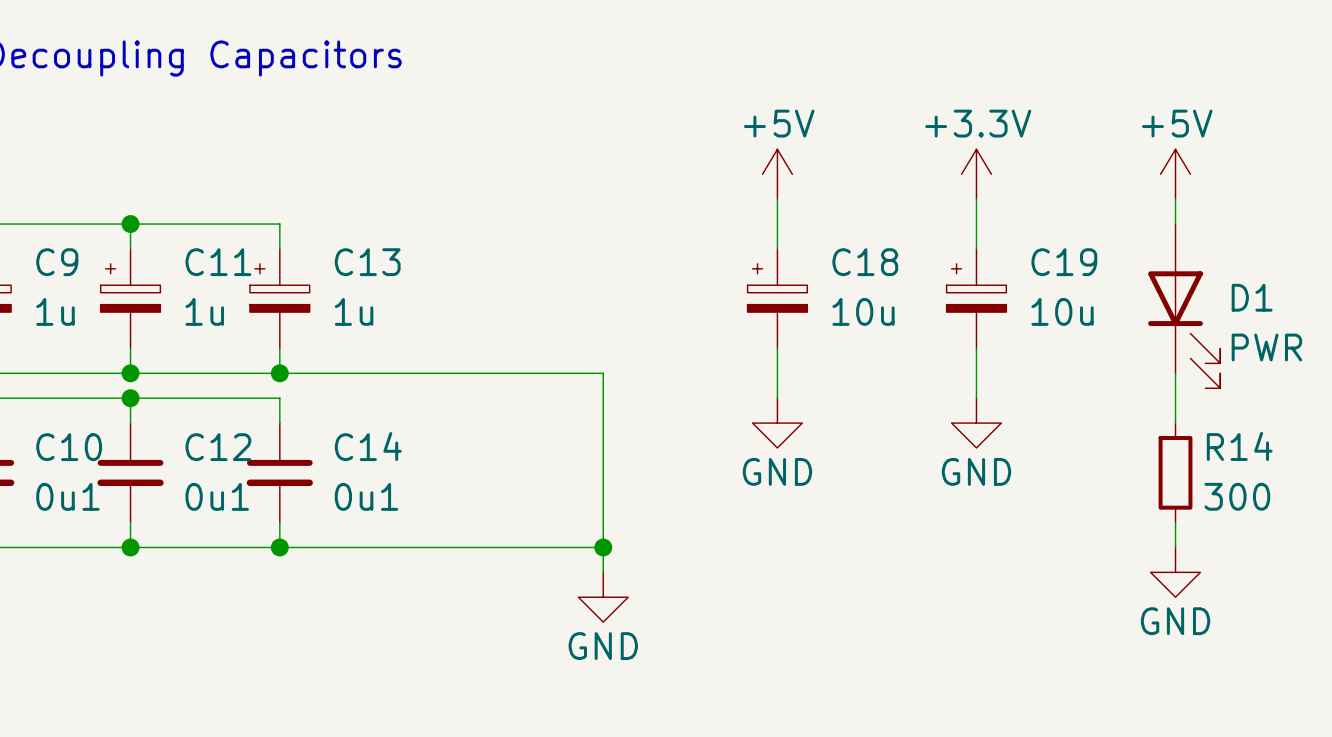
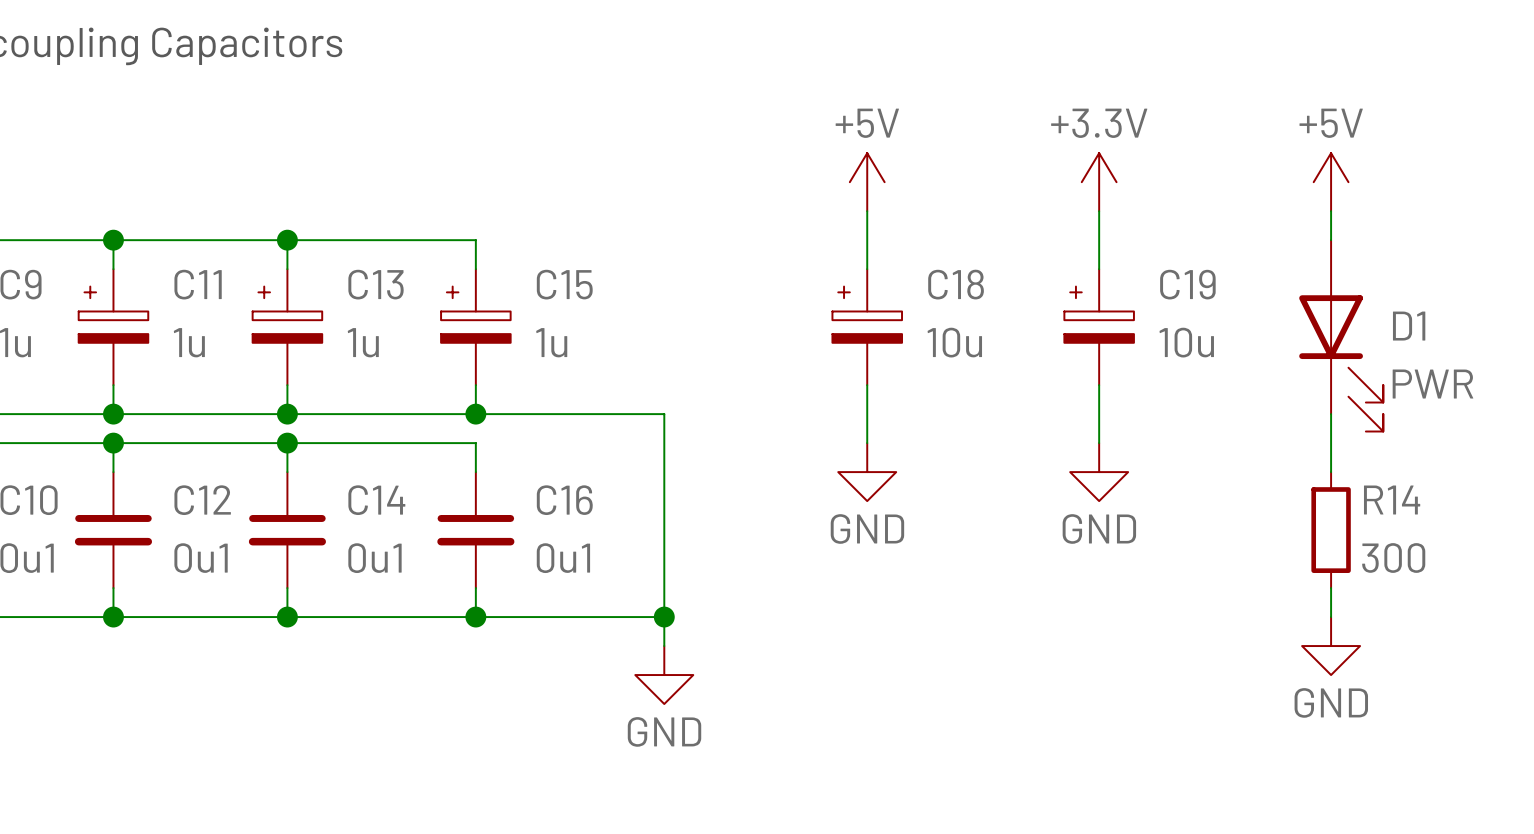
wire: none -> (287, 240) (475, 240) (475, 269)
junction: none -> (287, 240)
C15: none -> 1u (475, 327)
wire: none -> (475, 385) (475, 414)
junction: none -> (475, 414)
wire: none -> (287, 443) (475, 443) (475, 472)
junction: none -> (287, 443)
C16: none -> 0u1 (475, 530)
wire: none -> (475, 588) (475, 617)
junction: none -> (475, 617)

